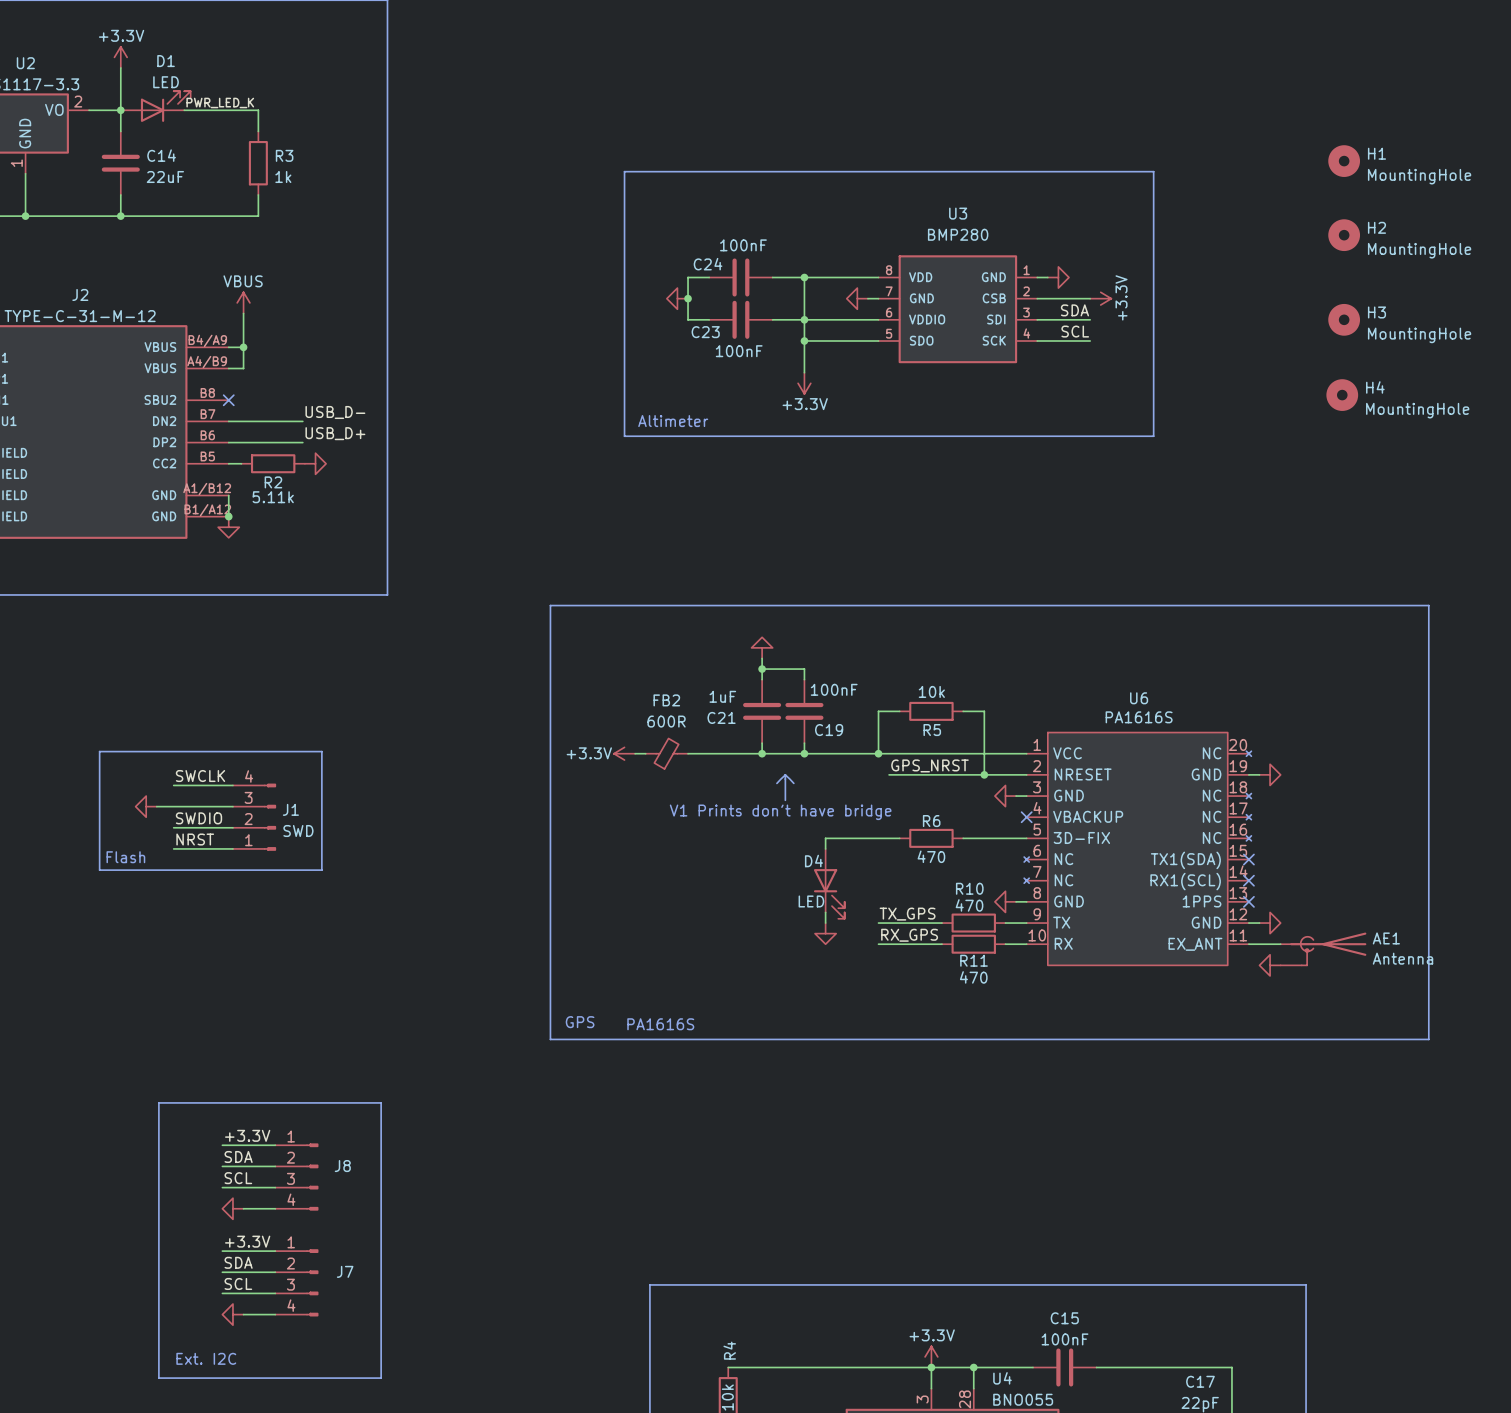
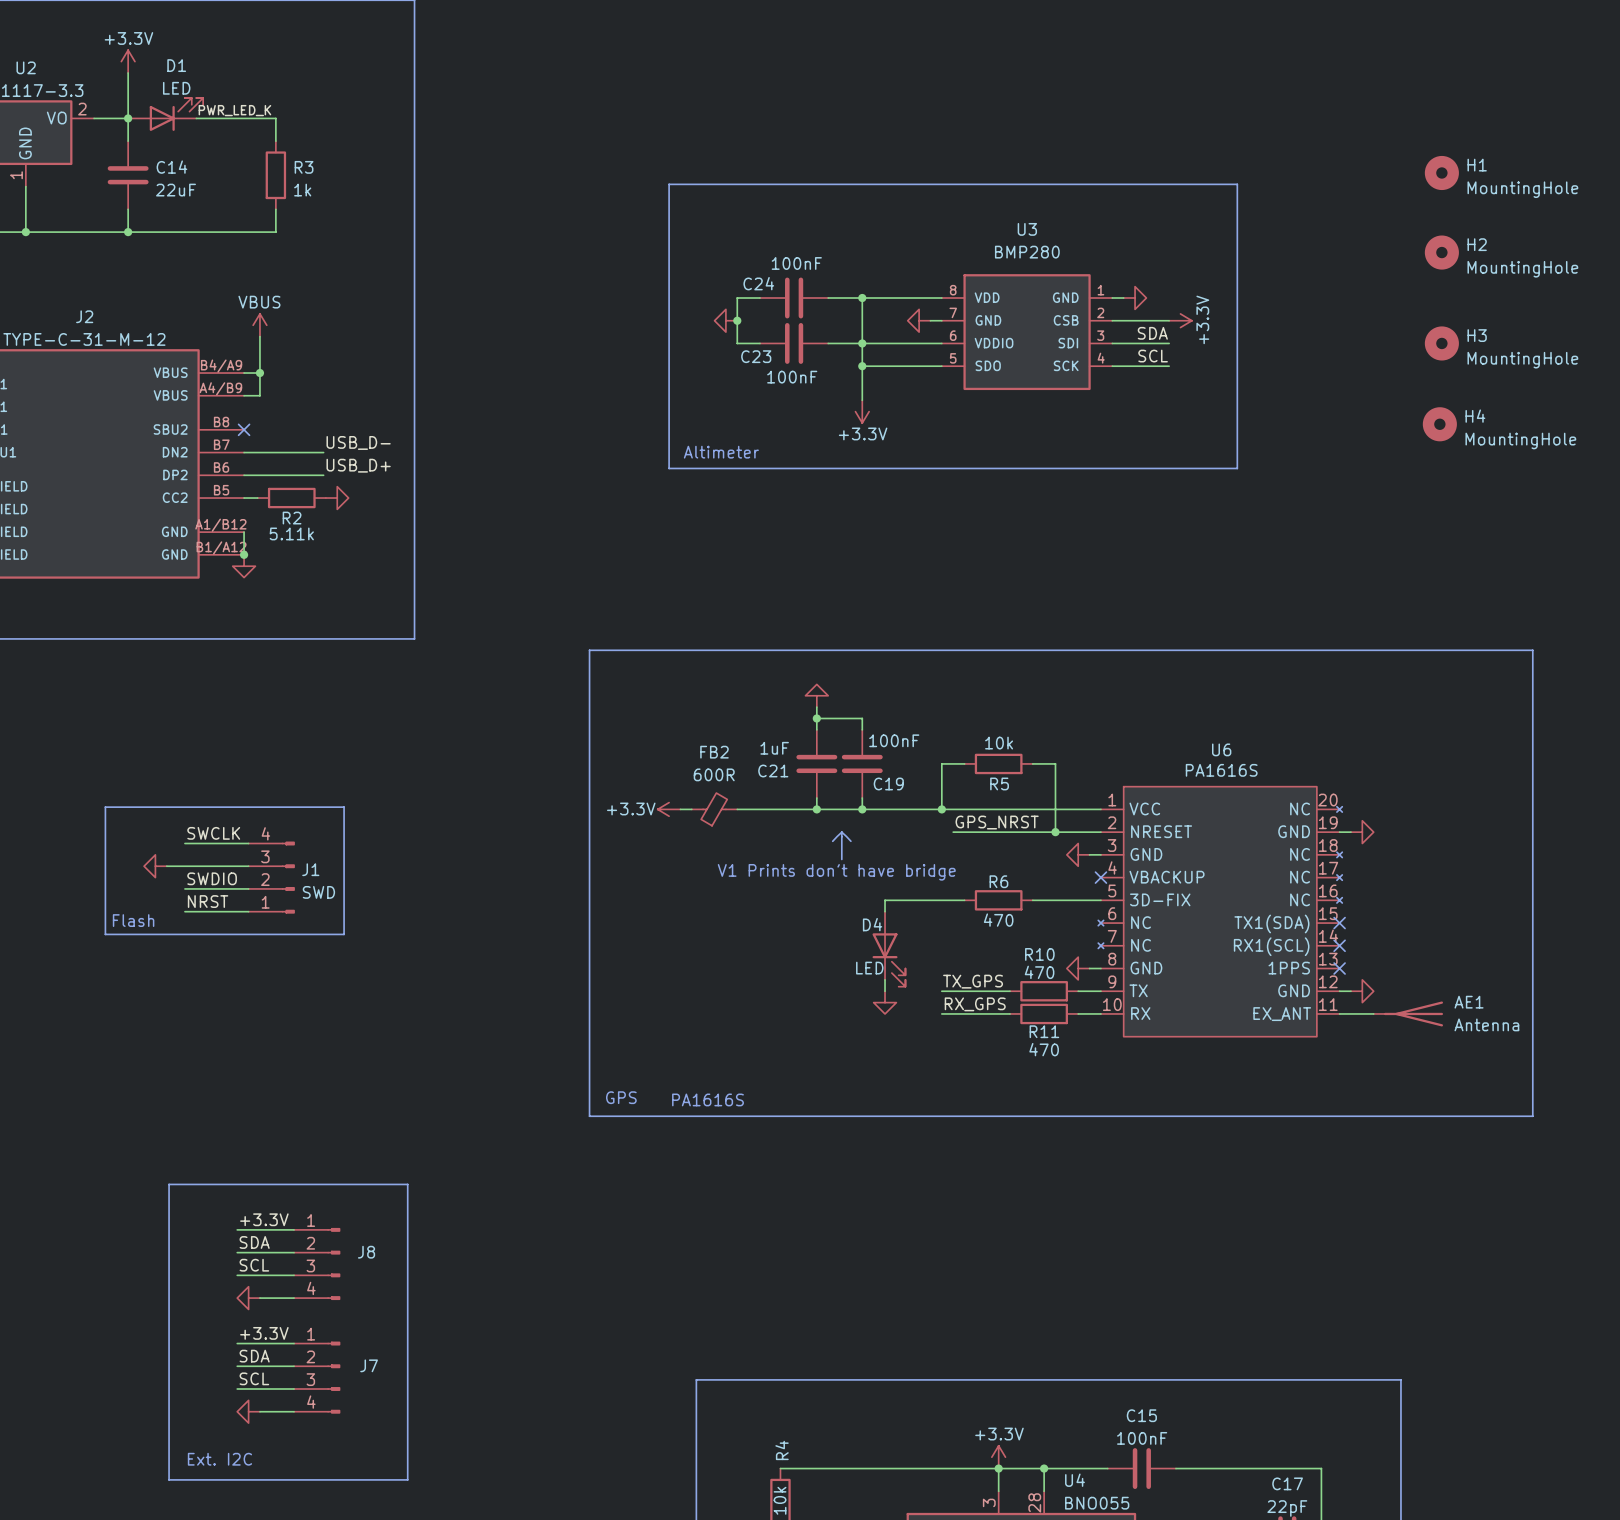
AE1 symbol: [1280, 932, 1367, 966] -> [1373, 1001, 1444, 1027]
power symbol: (1270, 965) -> none

